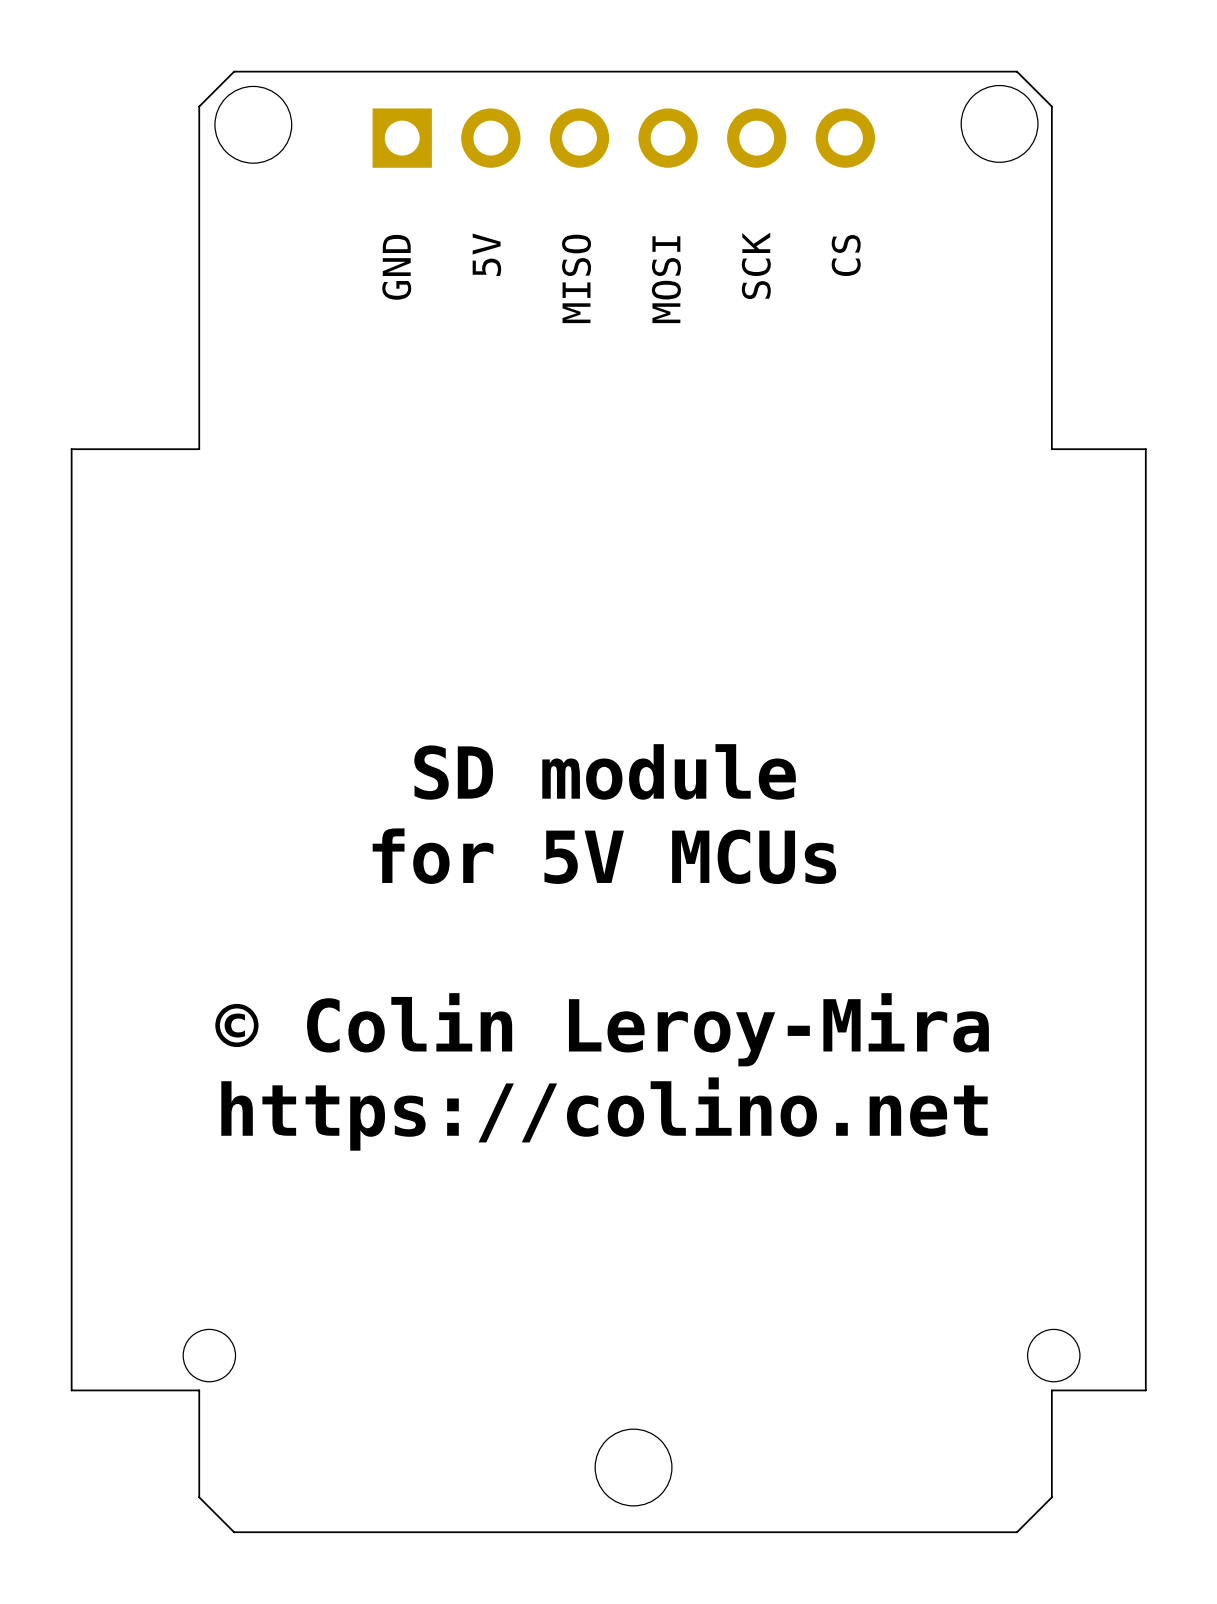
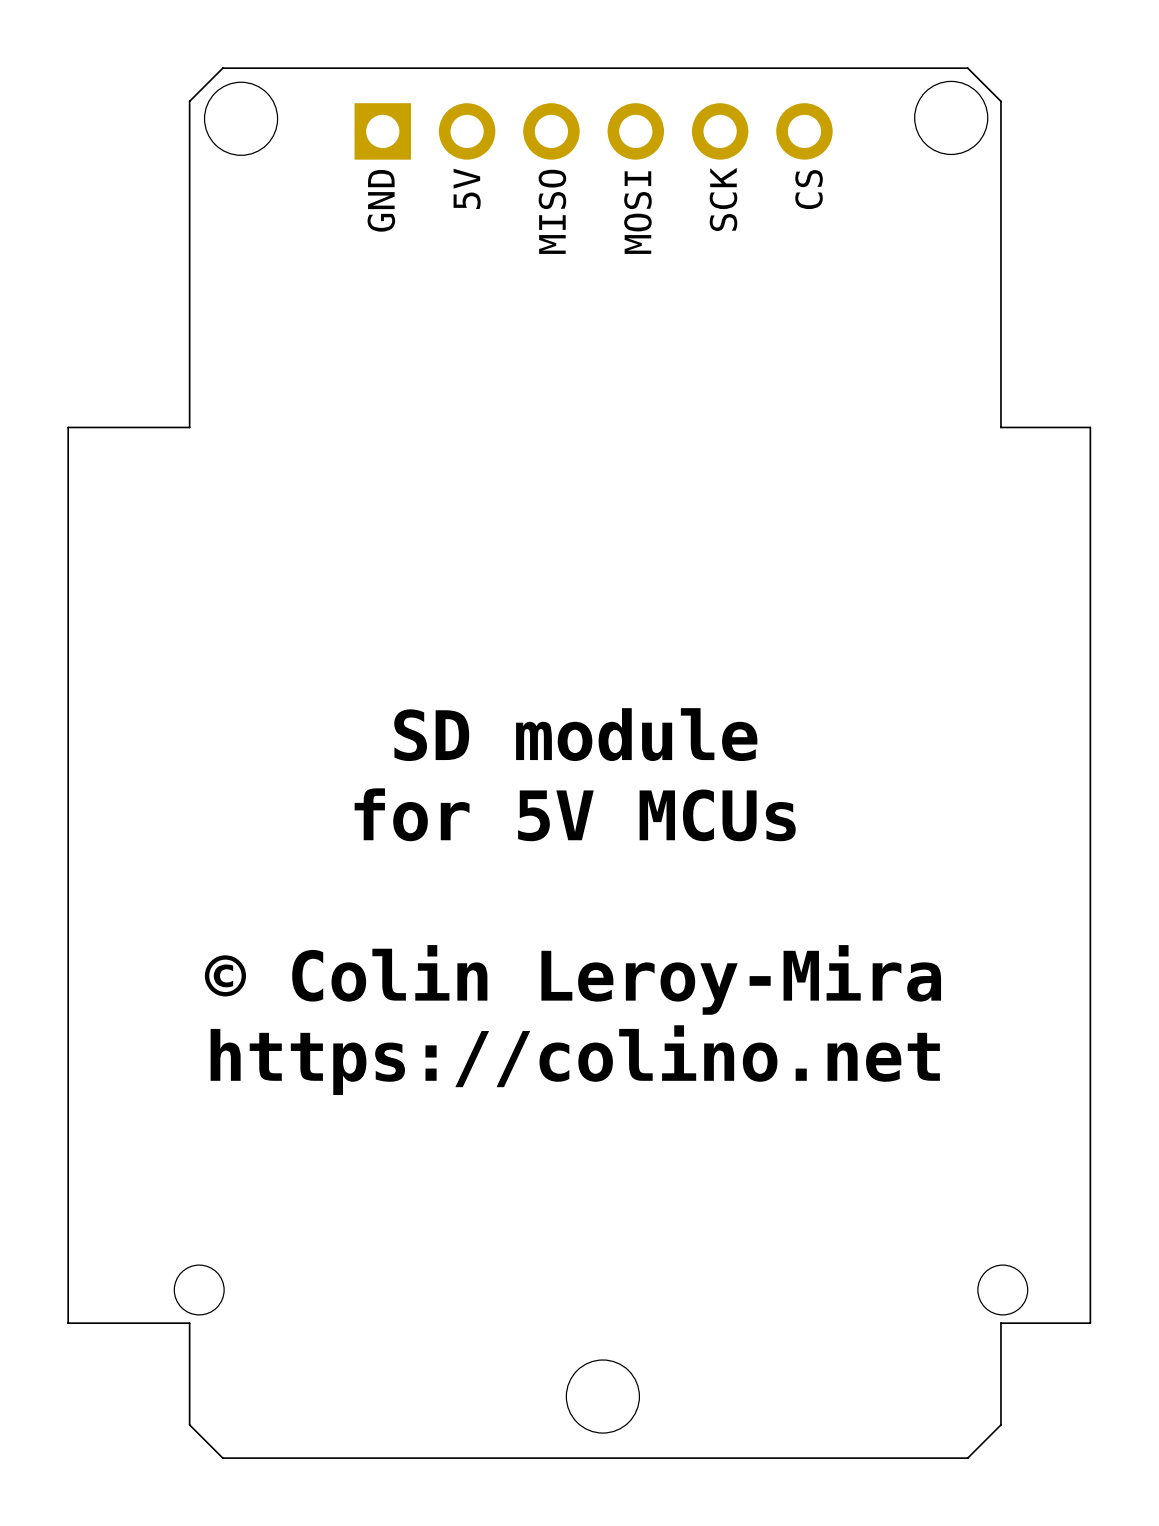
text position: 5V (486, 254) -> 5V (467, 188)
text position: CS (846, 255) -> CS (809, 189)
text position: SCK (756, 265) -> SCK (723, 199)
text position: GND (396, 267) -> GND (381, 200)
text position: MISO (576, 278) -> MISO (552, 211)
text position: MOSI (666, 279) -> MOSI (637, 212)

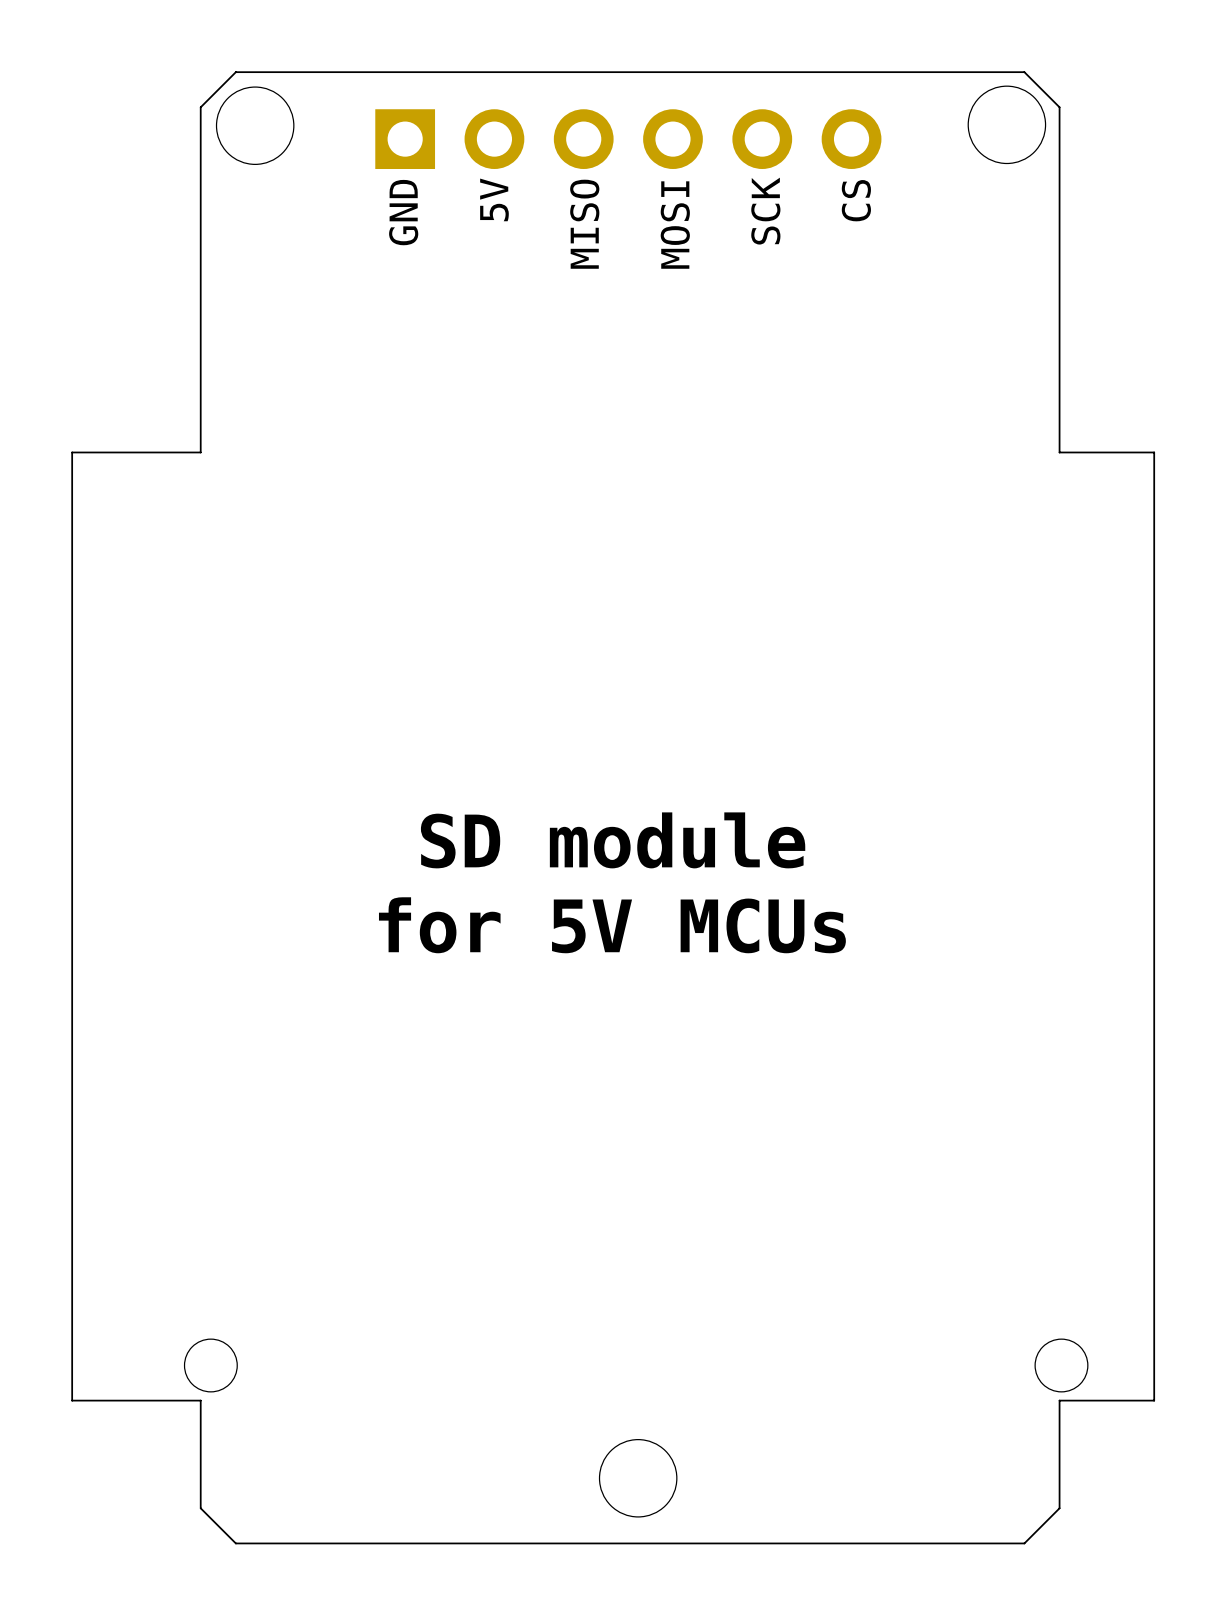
text: SD module (575, 734) -> none
text: for 5V MCUs (575, 814) -> SD module (613, 840)
text: none -> for 5V MCUs (612, 925)
text: © Colin Leroy-Mira (572, 979) -> none
text: https://colino.net (575, 1060) -> none

